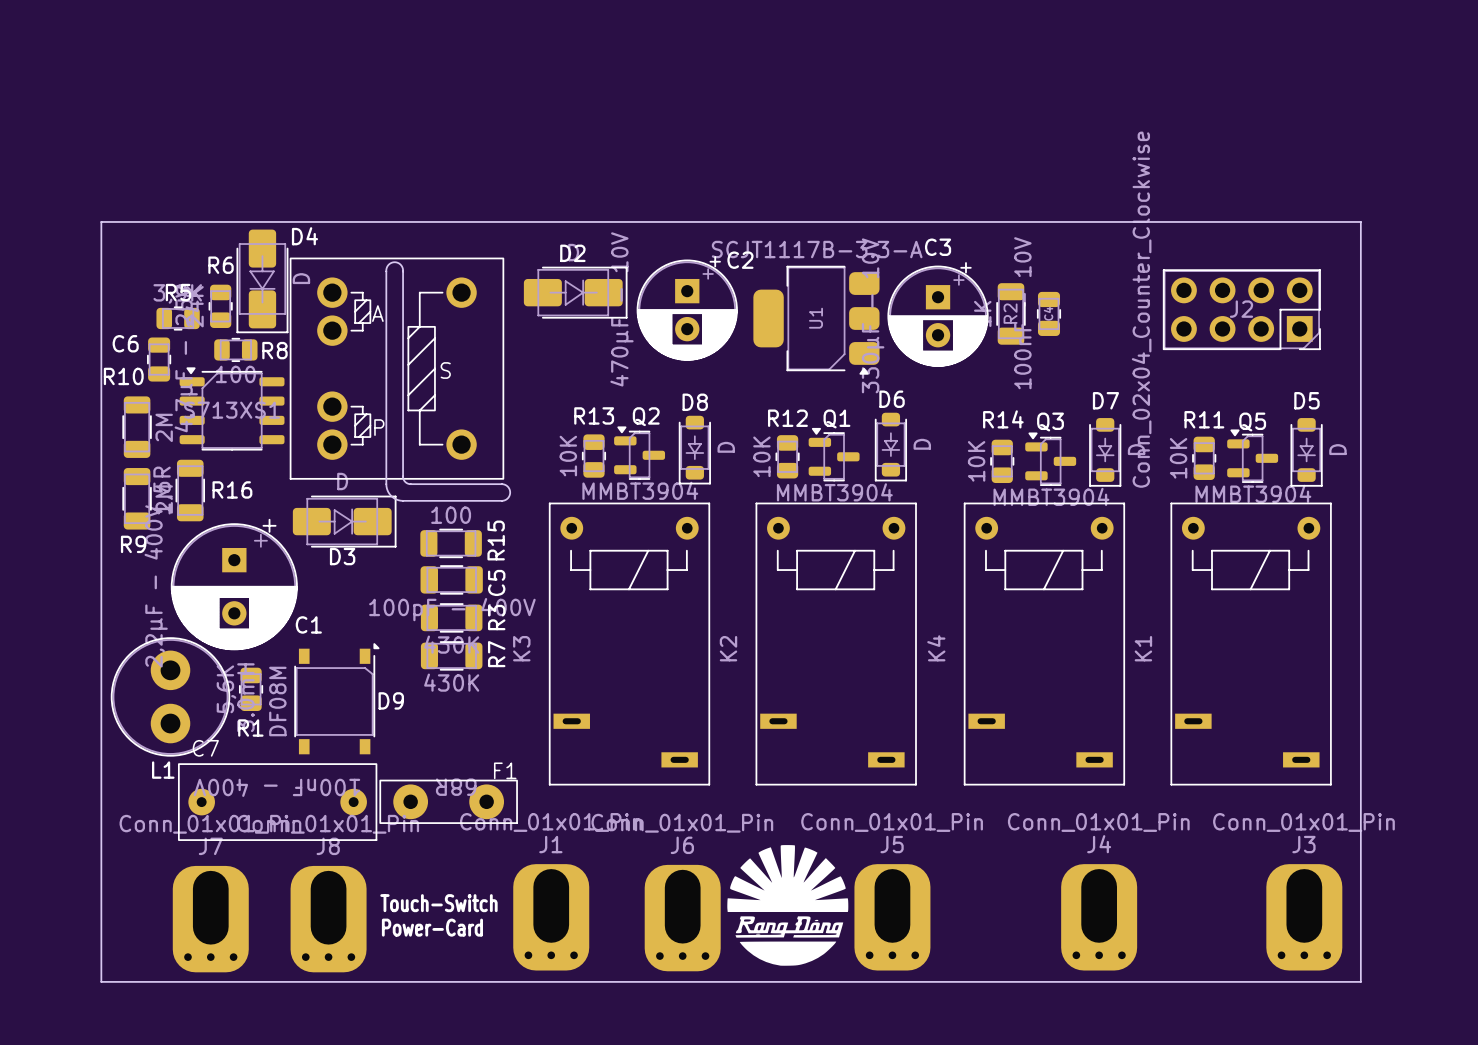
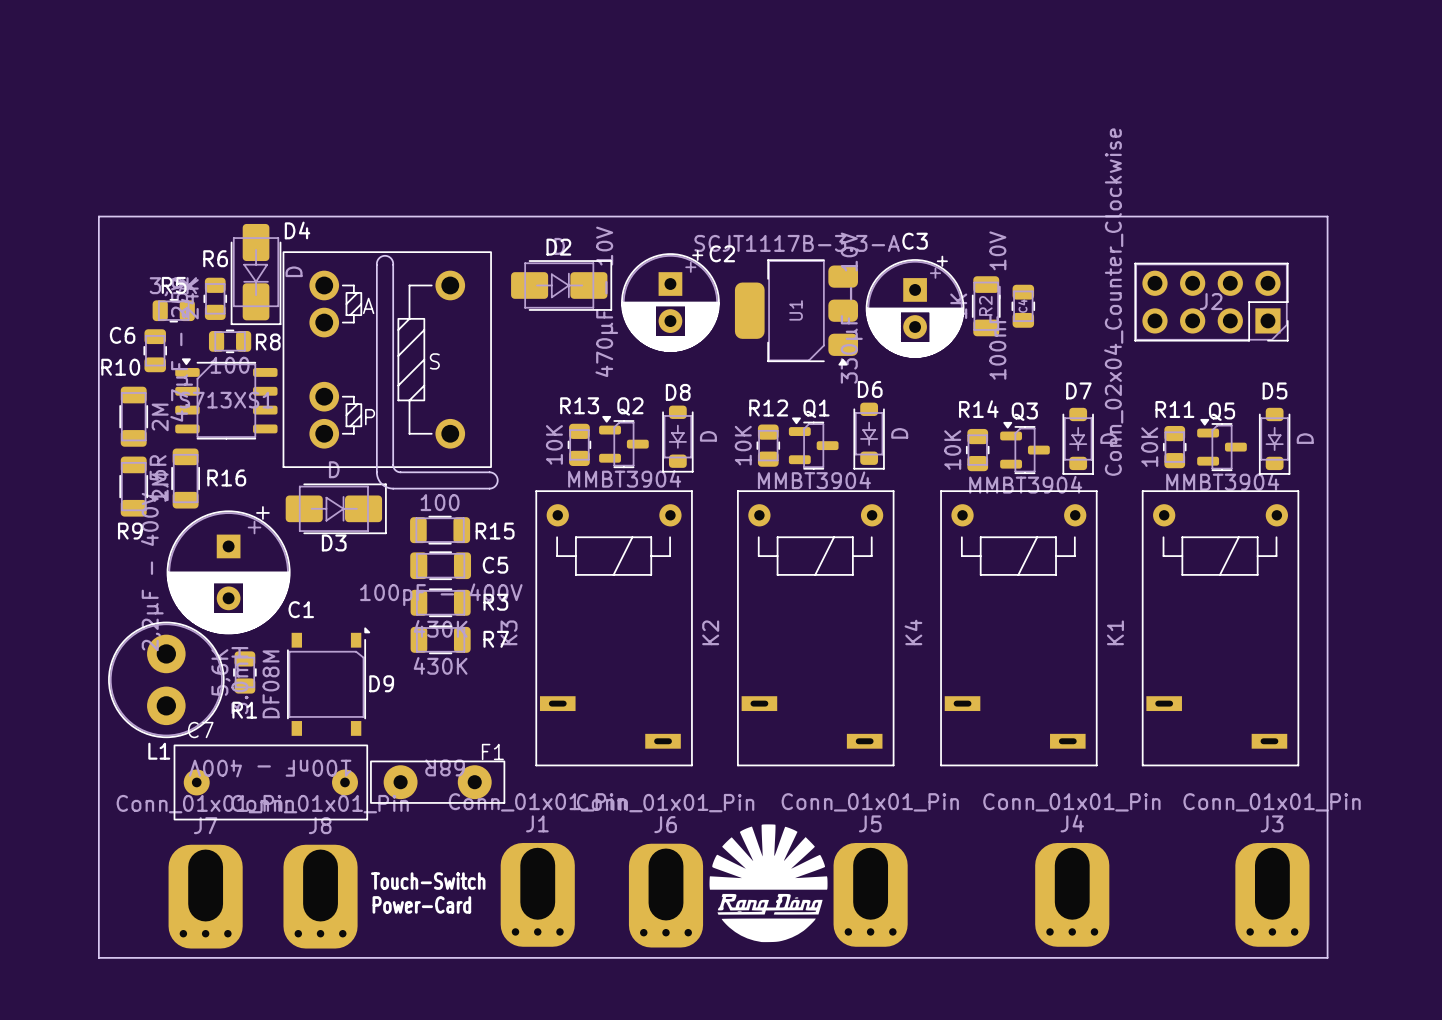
R15 name rotation: 0° (496, 540) -> 90° clockwise (495, 531)
C5 name rotation: 0° (496, 582) -> 90° clockwise (495, 565)
R3 name rotation: 0° (496, 617) -> 90° clockwise (495, 602)
R7 name rotation: 0° (496, 654) -> 90° clockwise (496, 639)

